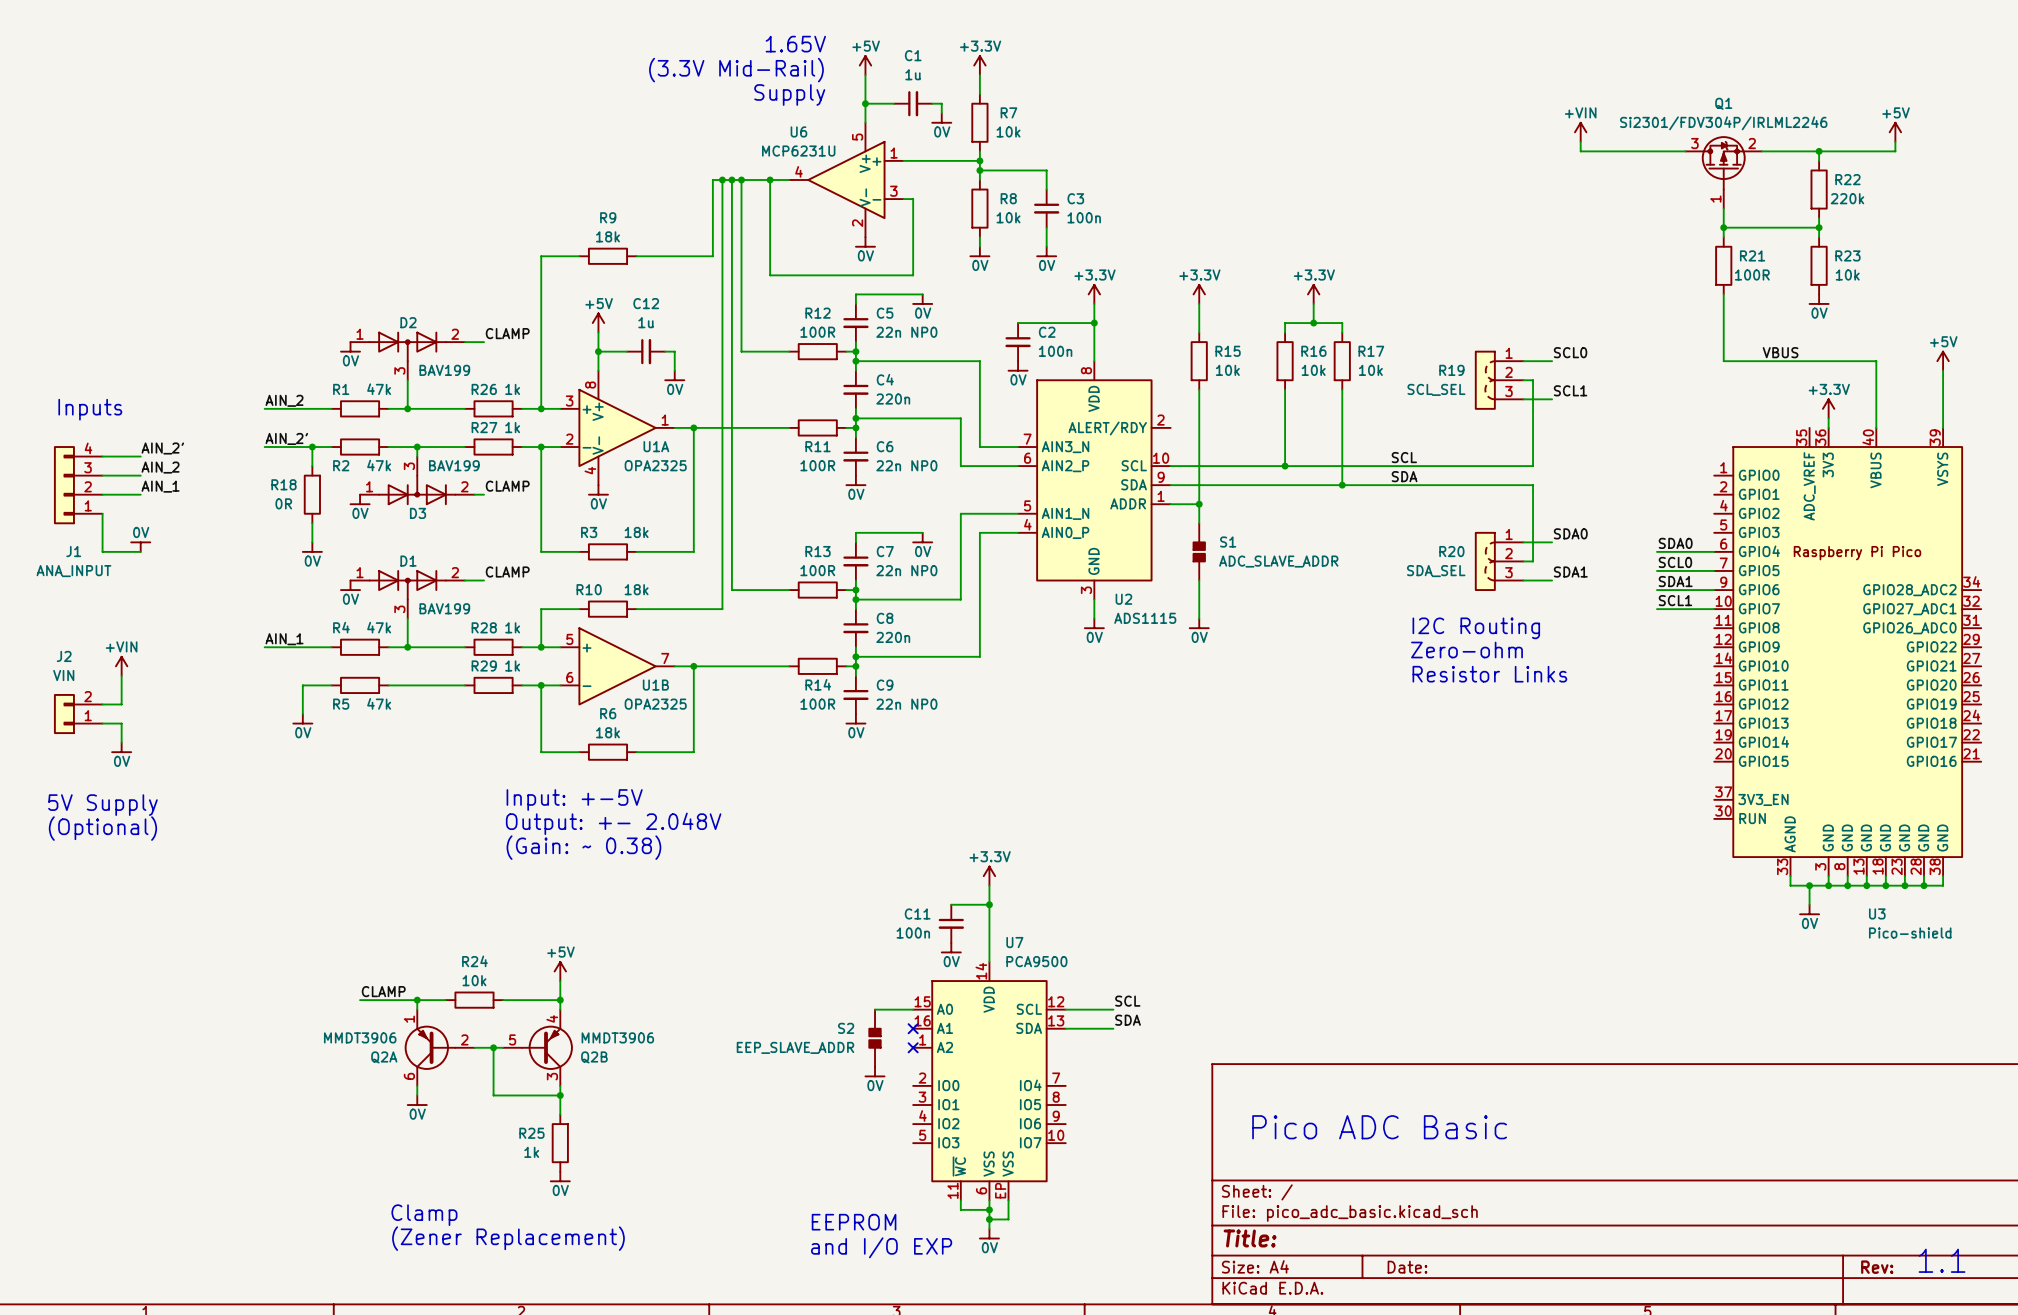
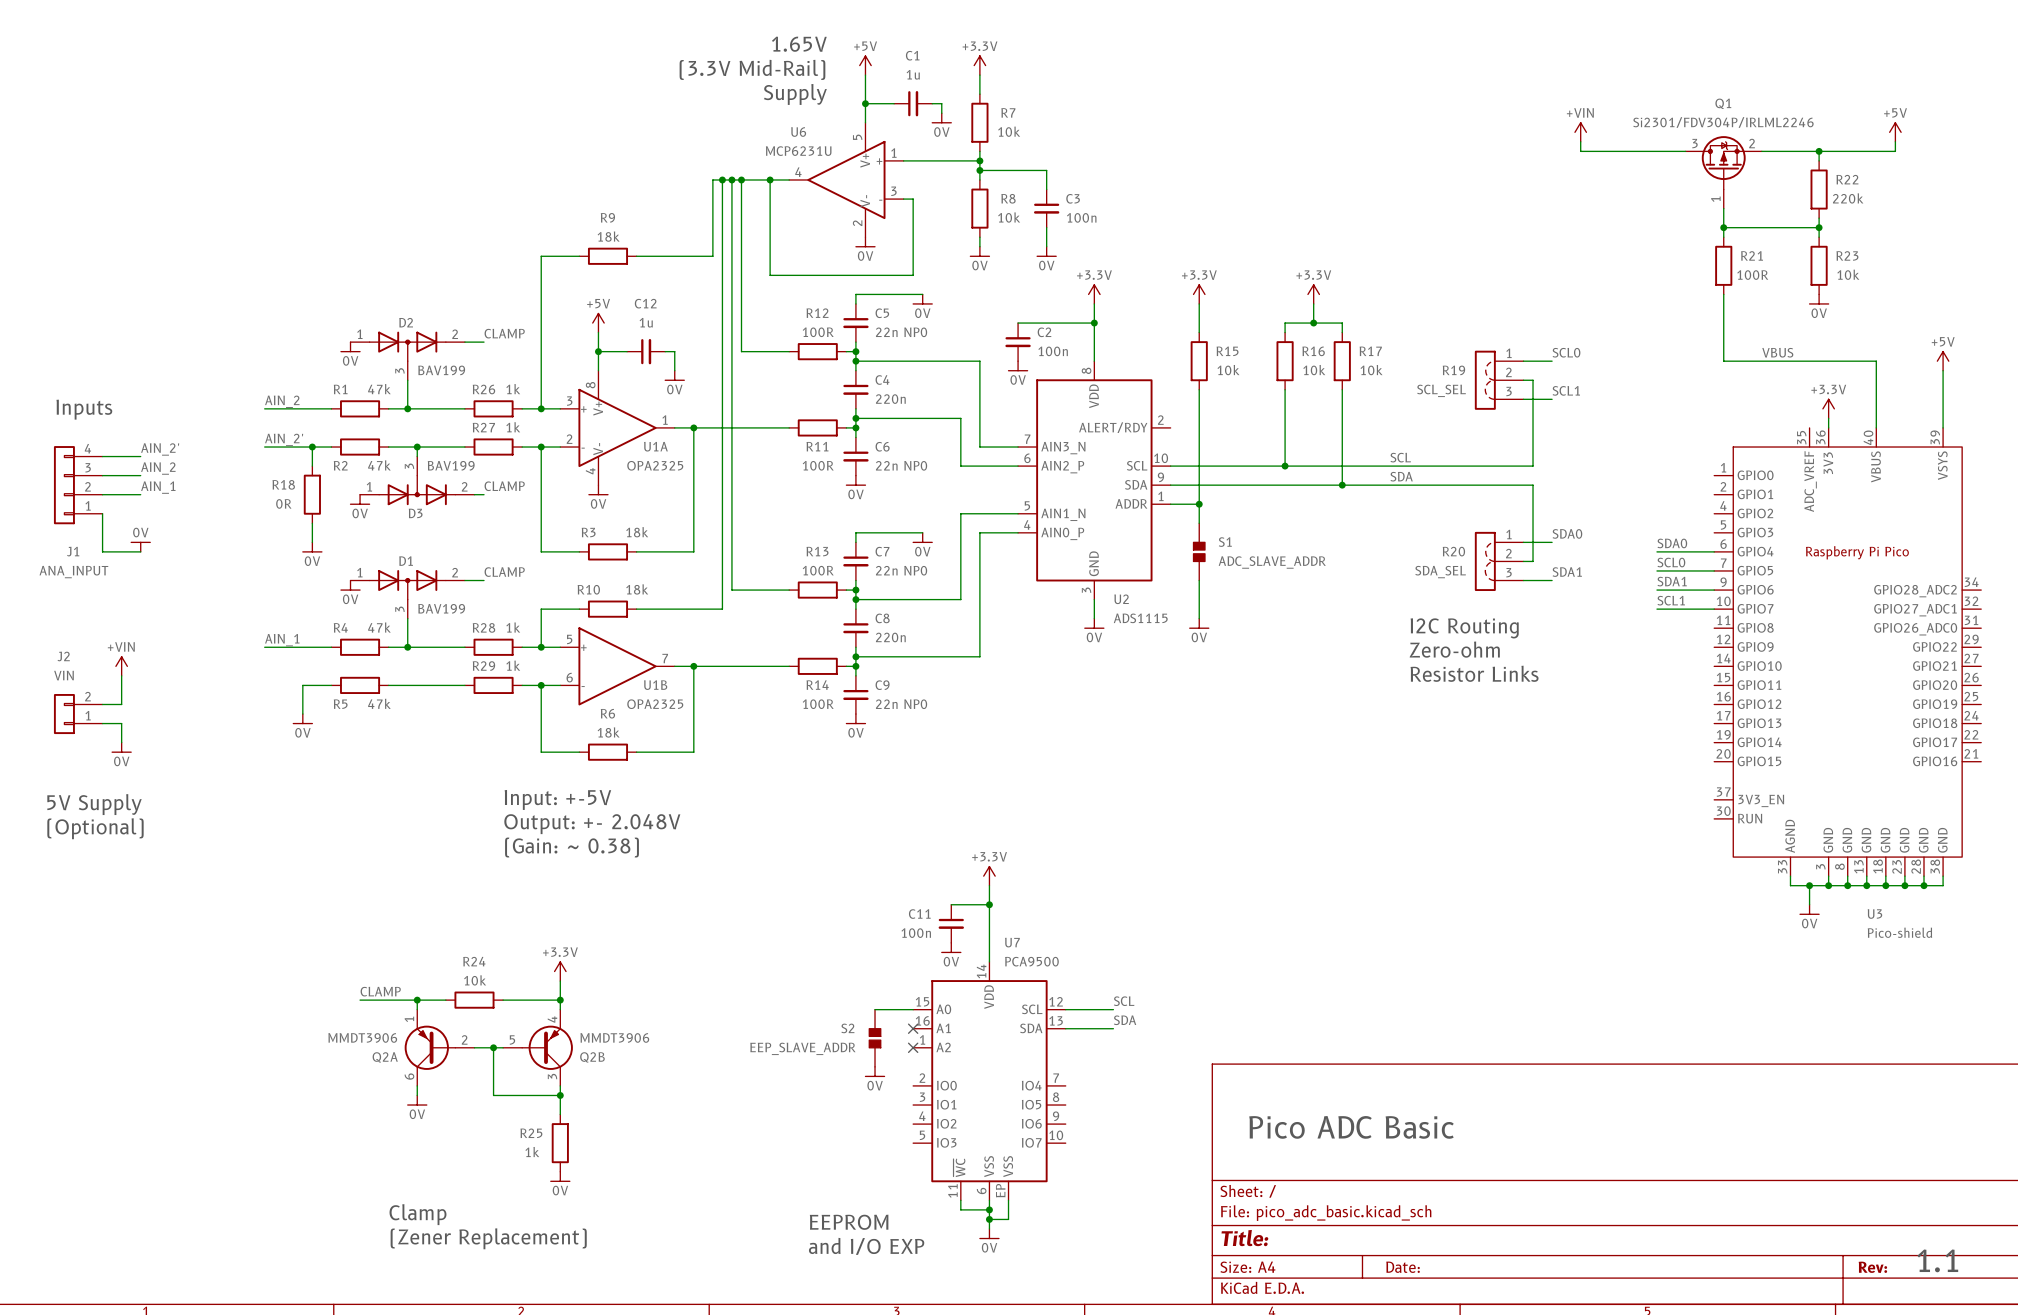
power symbol: +5V (560, 971) -> +3.3V (560, 971)

